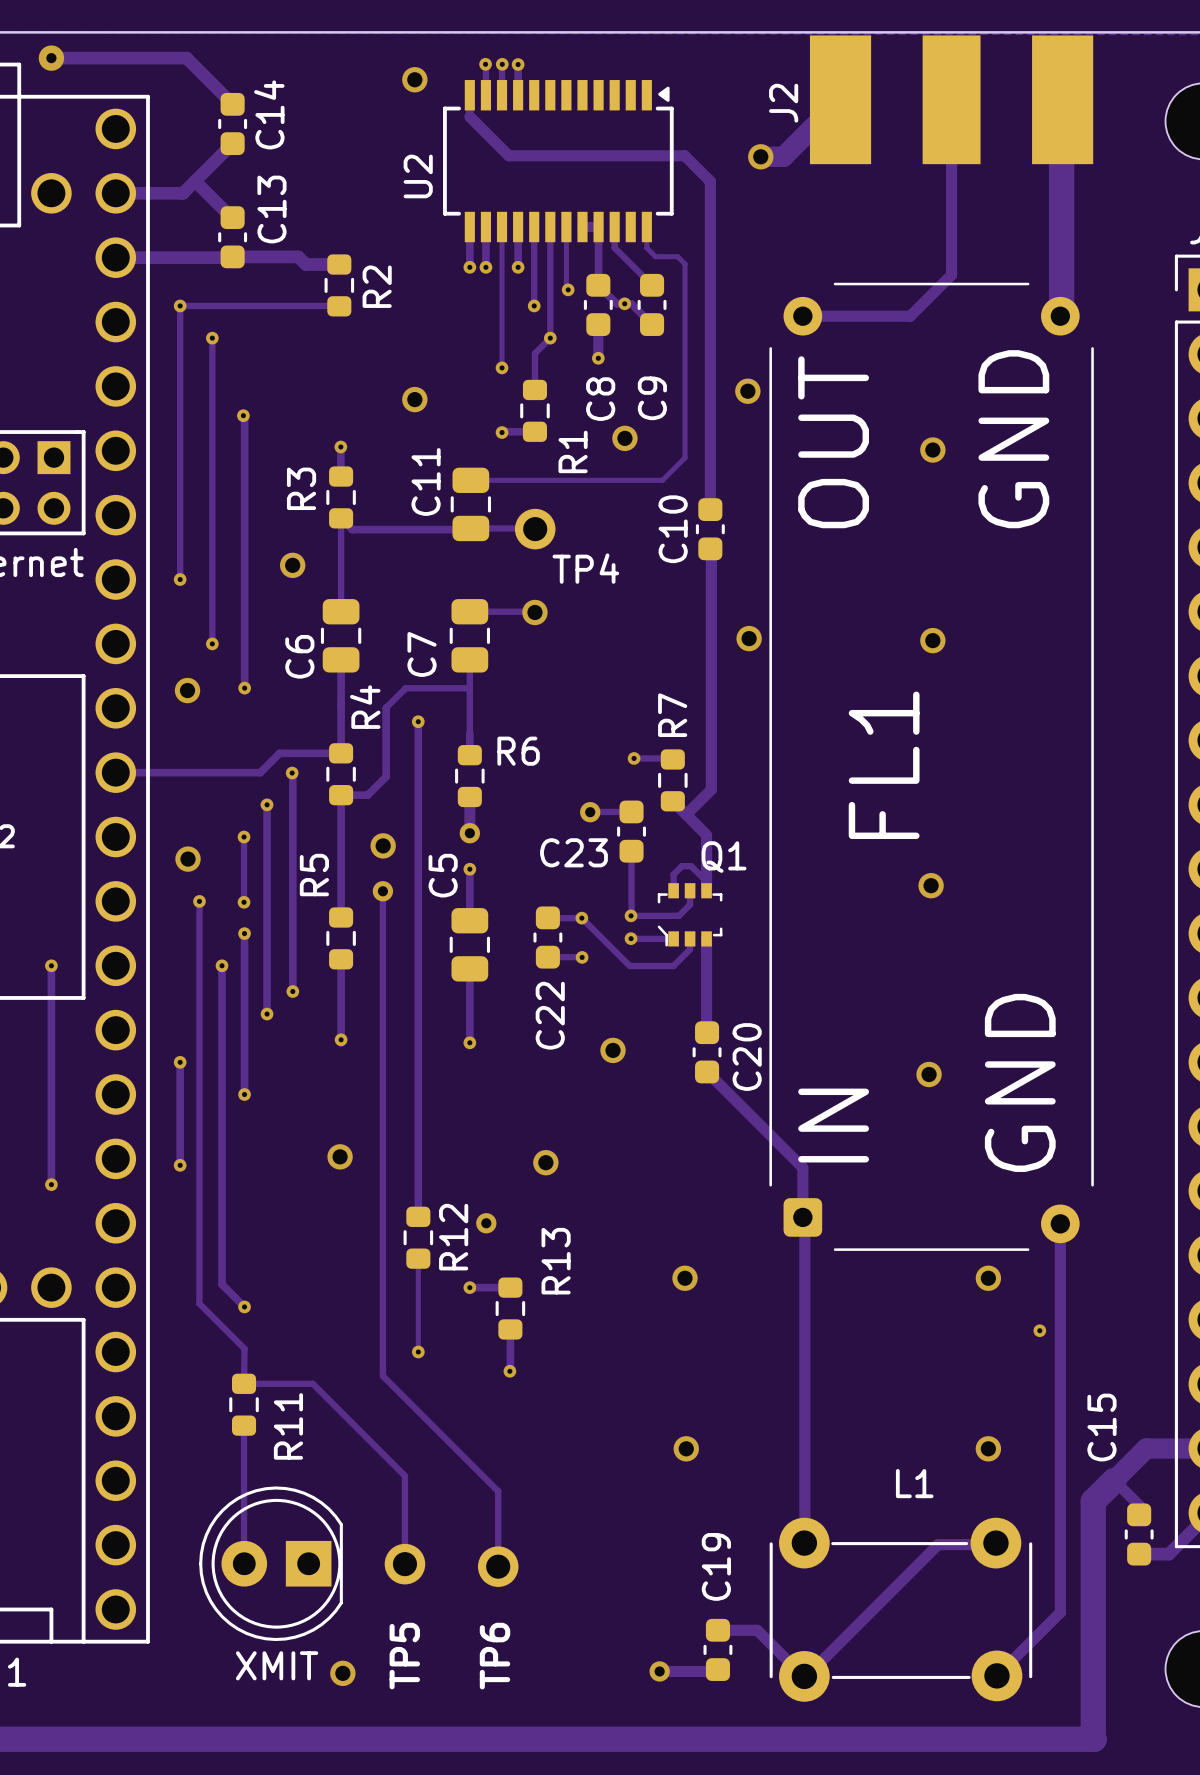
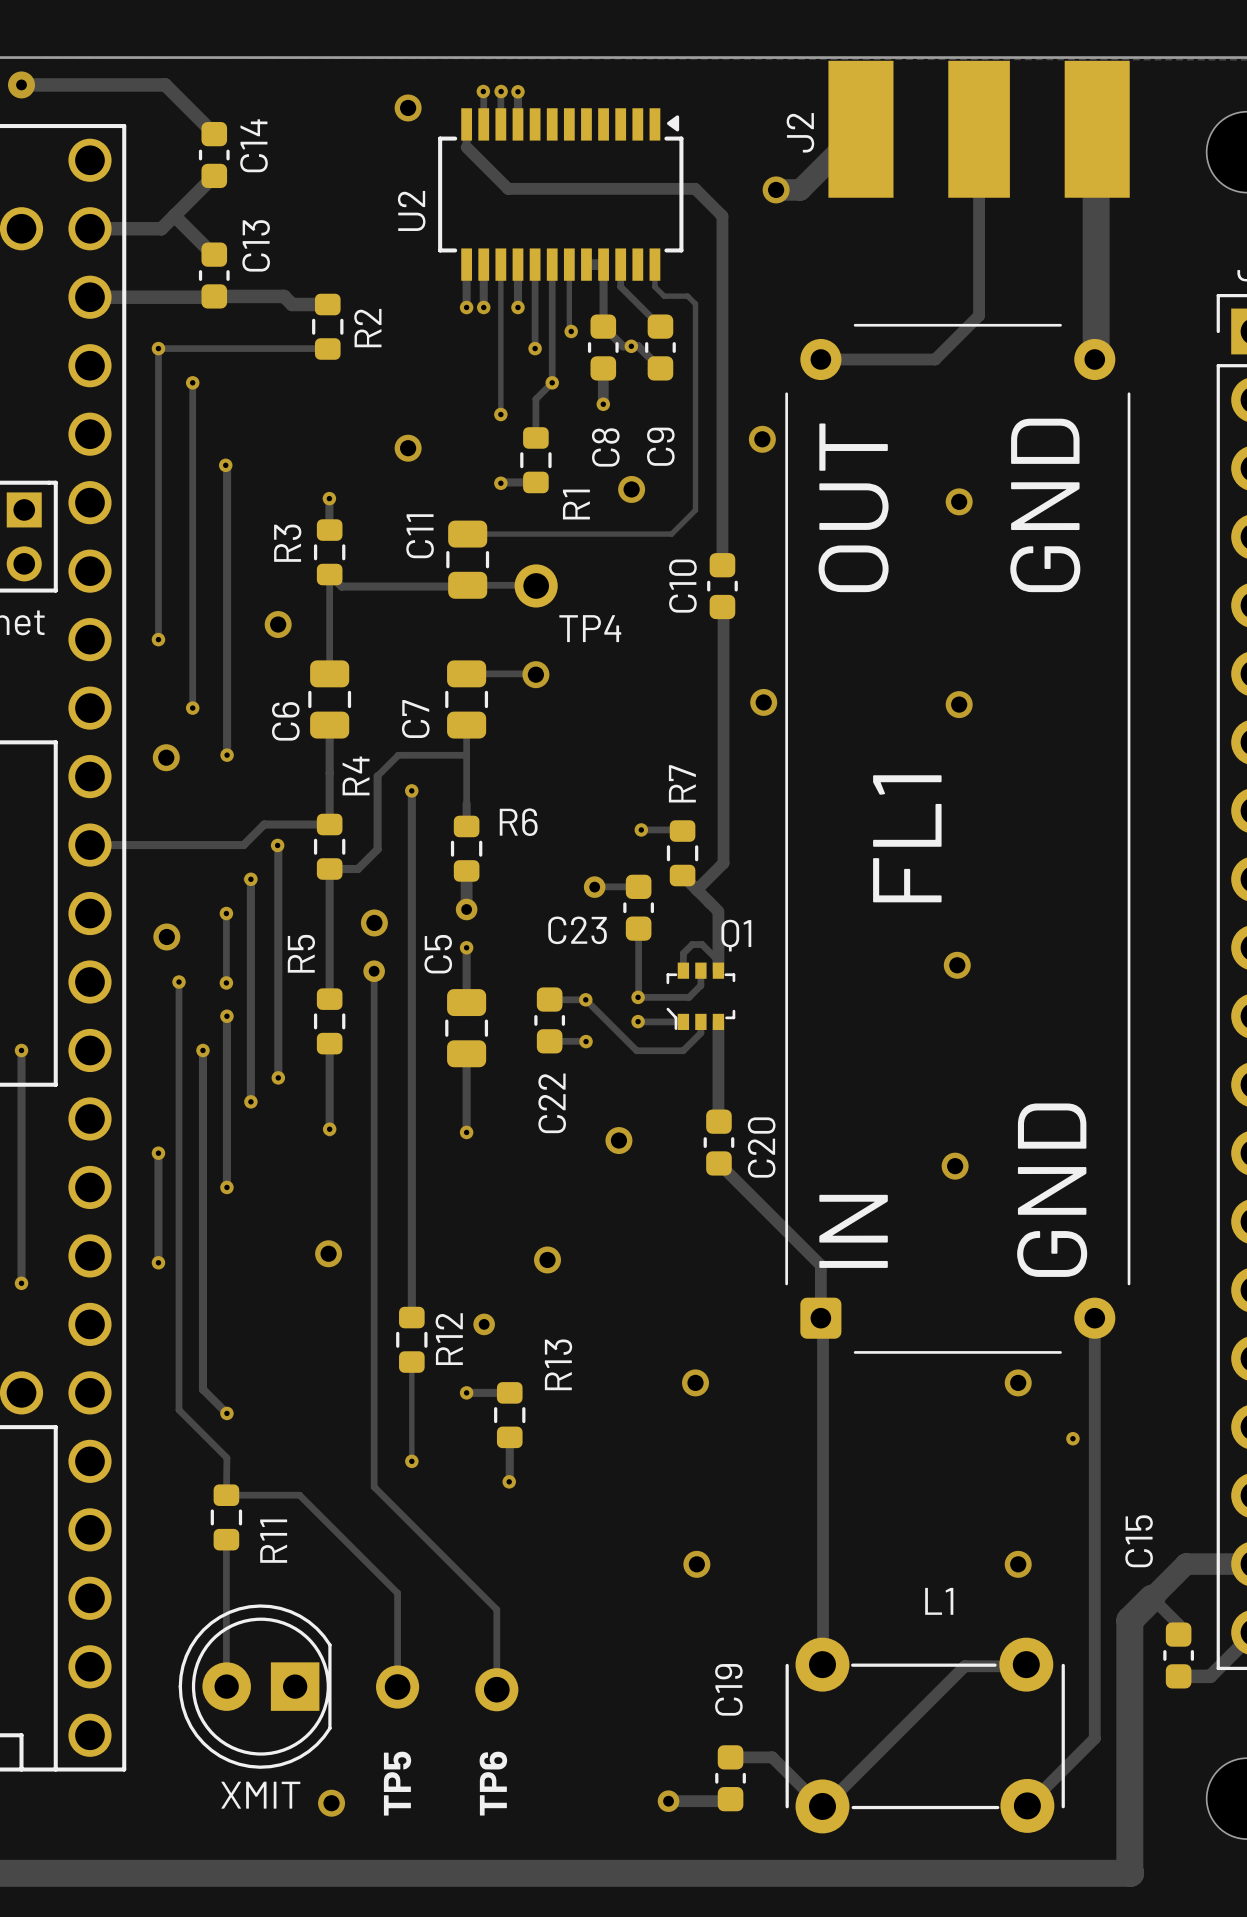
FL1 footprint: [769, 282, 1094, 1251] -> [785, 323, 1131, 1354]

